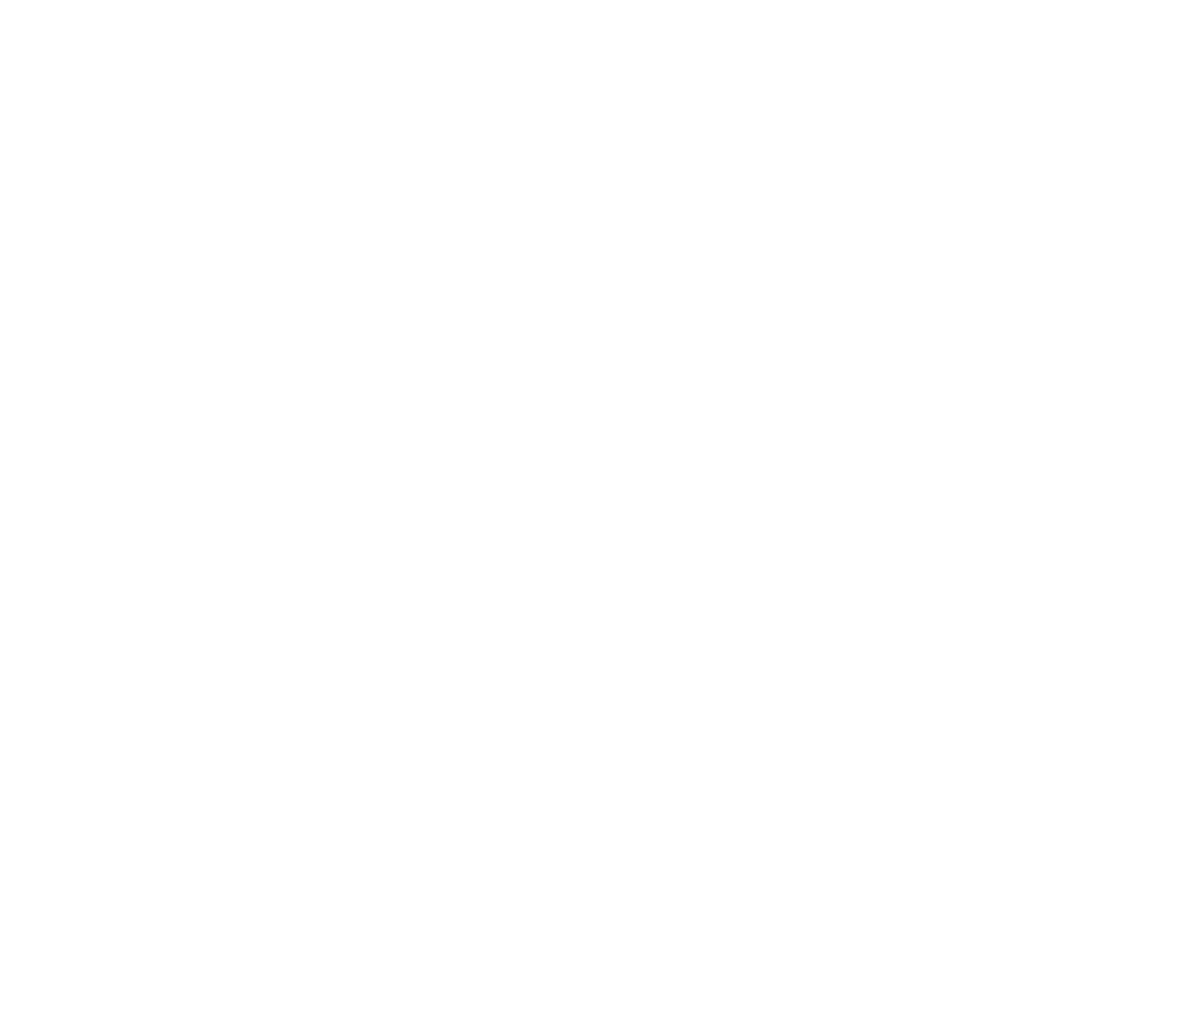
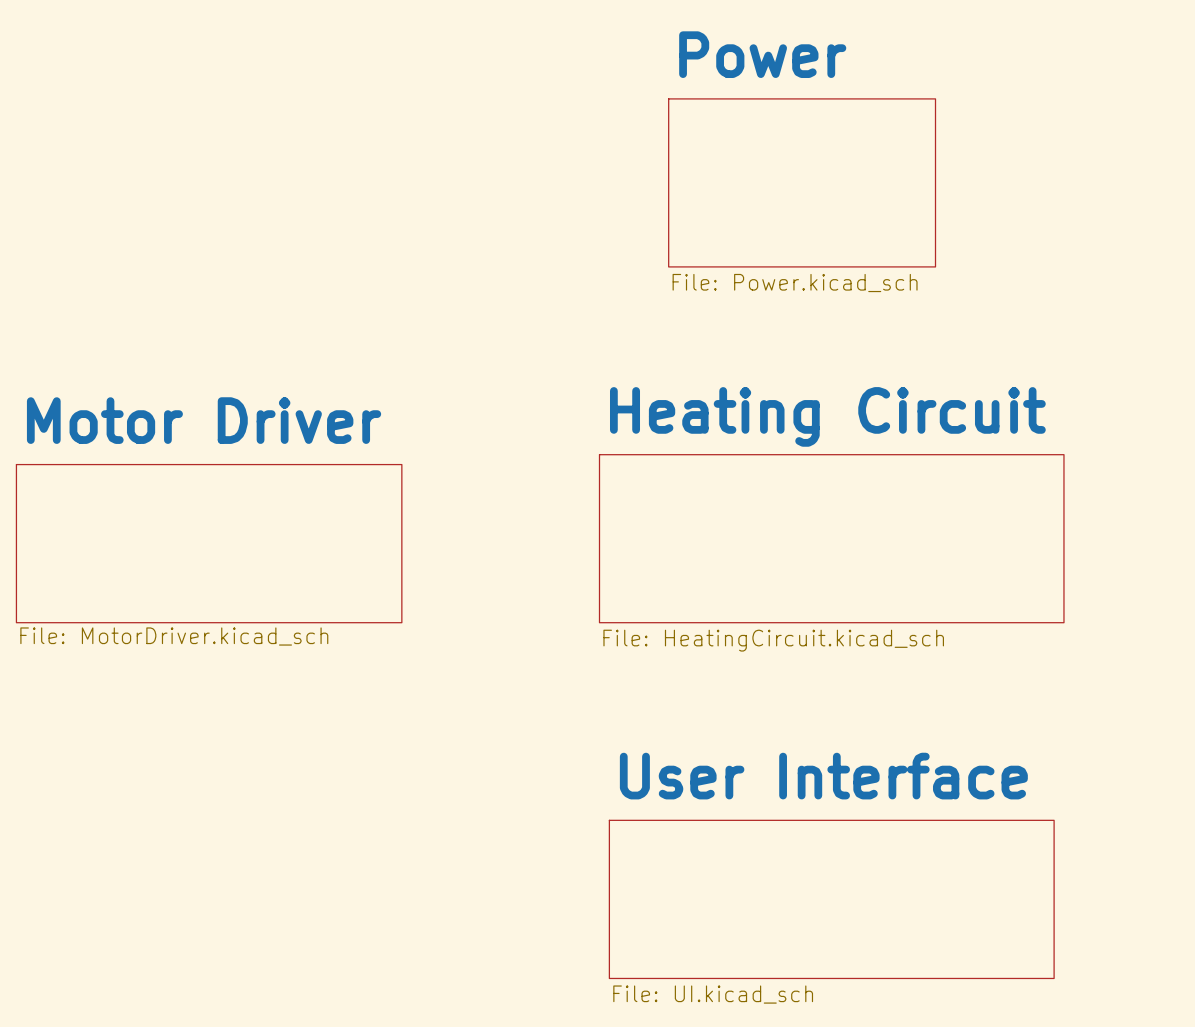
sheet Power: none -> File: Power.kicad_sch (802, 182)
sheet Heating Circuit: none -> File: HeatingCircuit.kicad_sch (831, 538)
sheet Motor Driver: none -> File: MotorDriver.kicad_sch (209, 543)
sheet User Interface: none -> File: UI.kicad_sch (831, 899)

